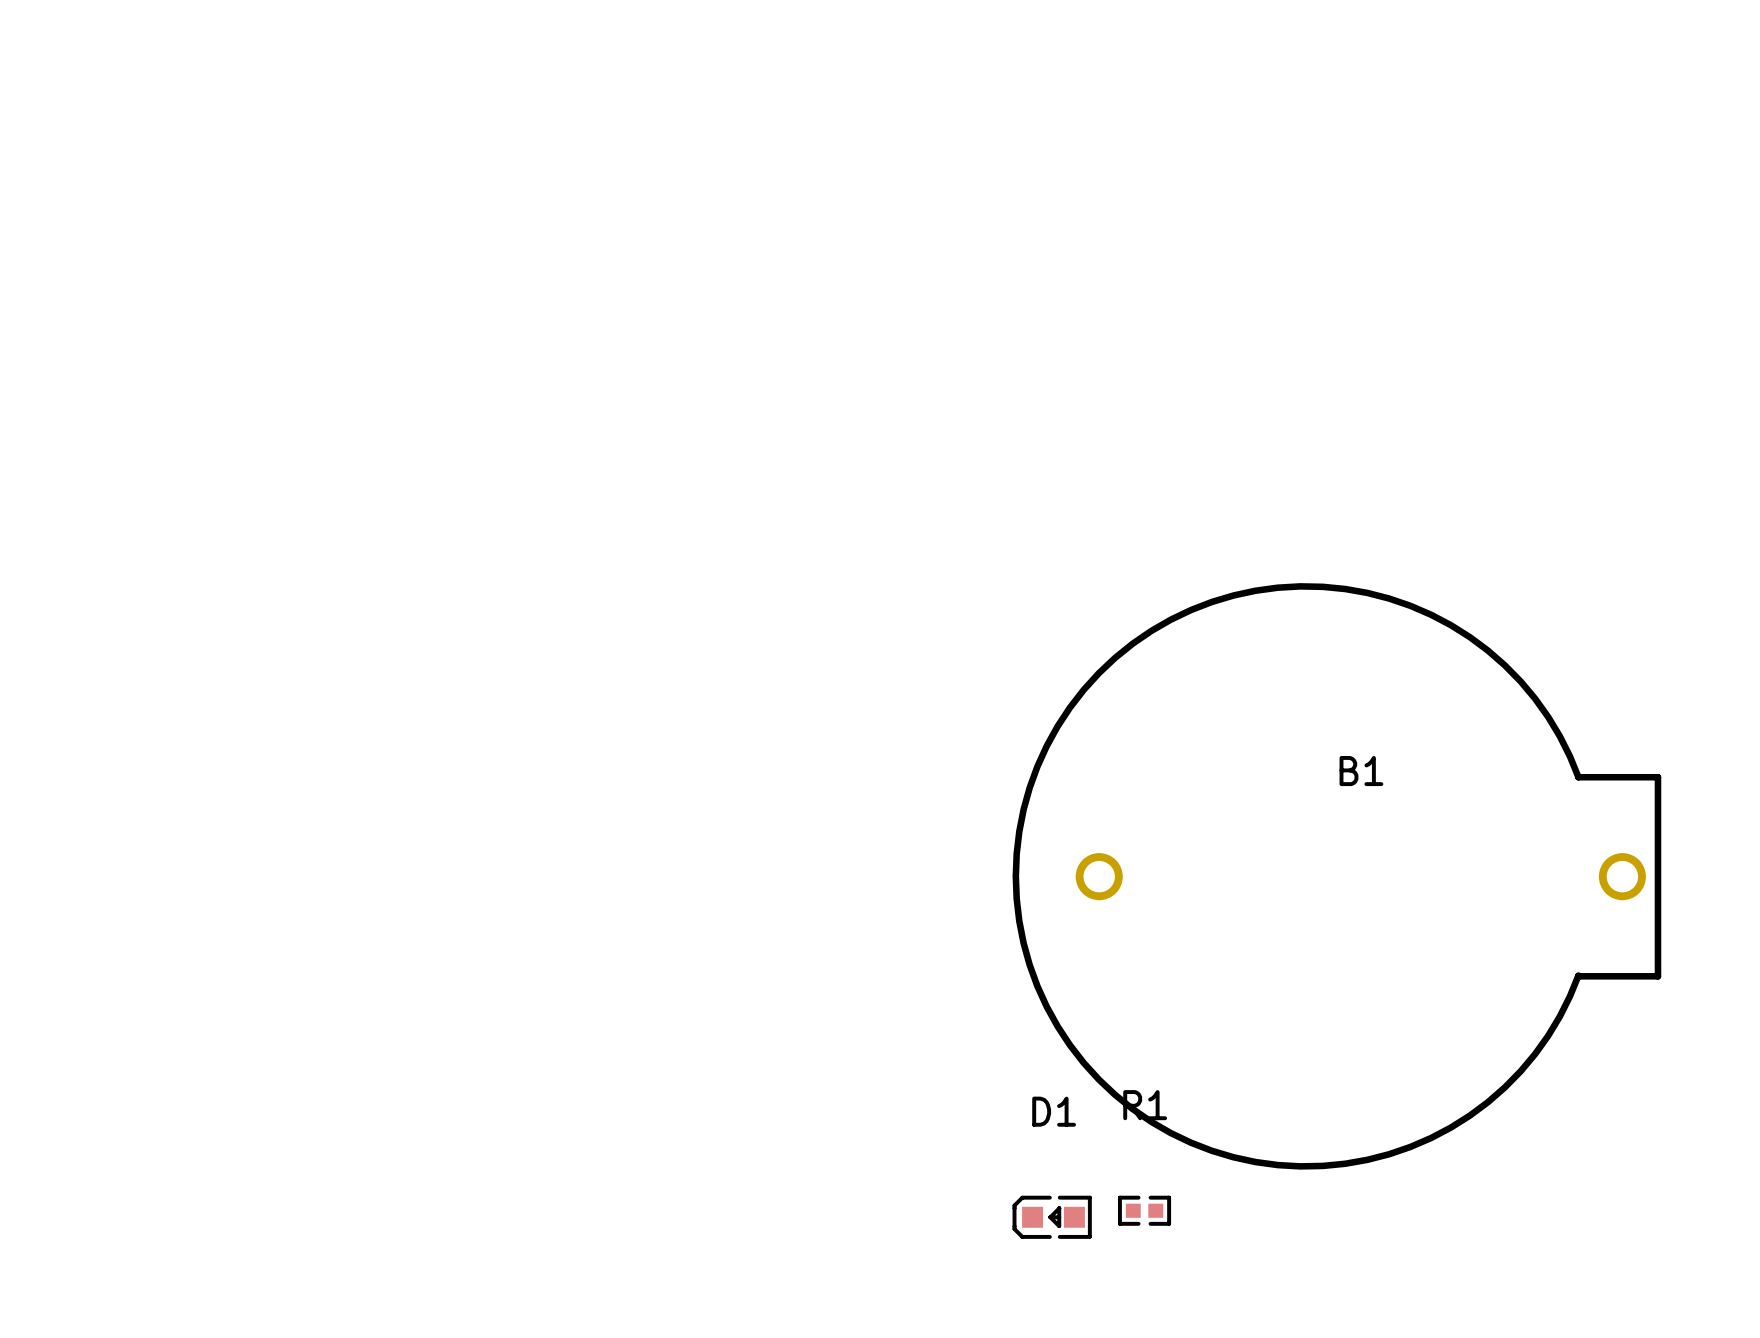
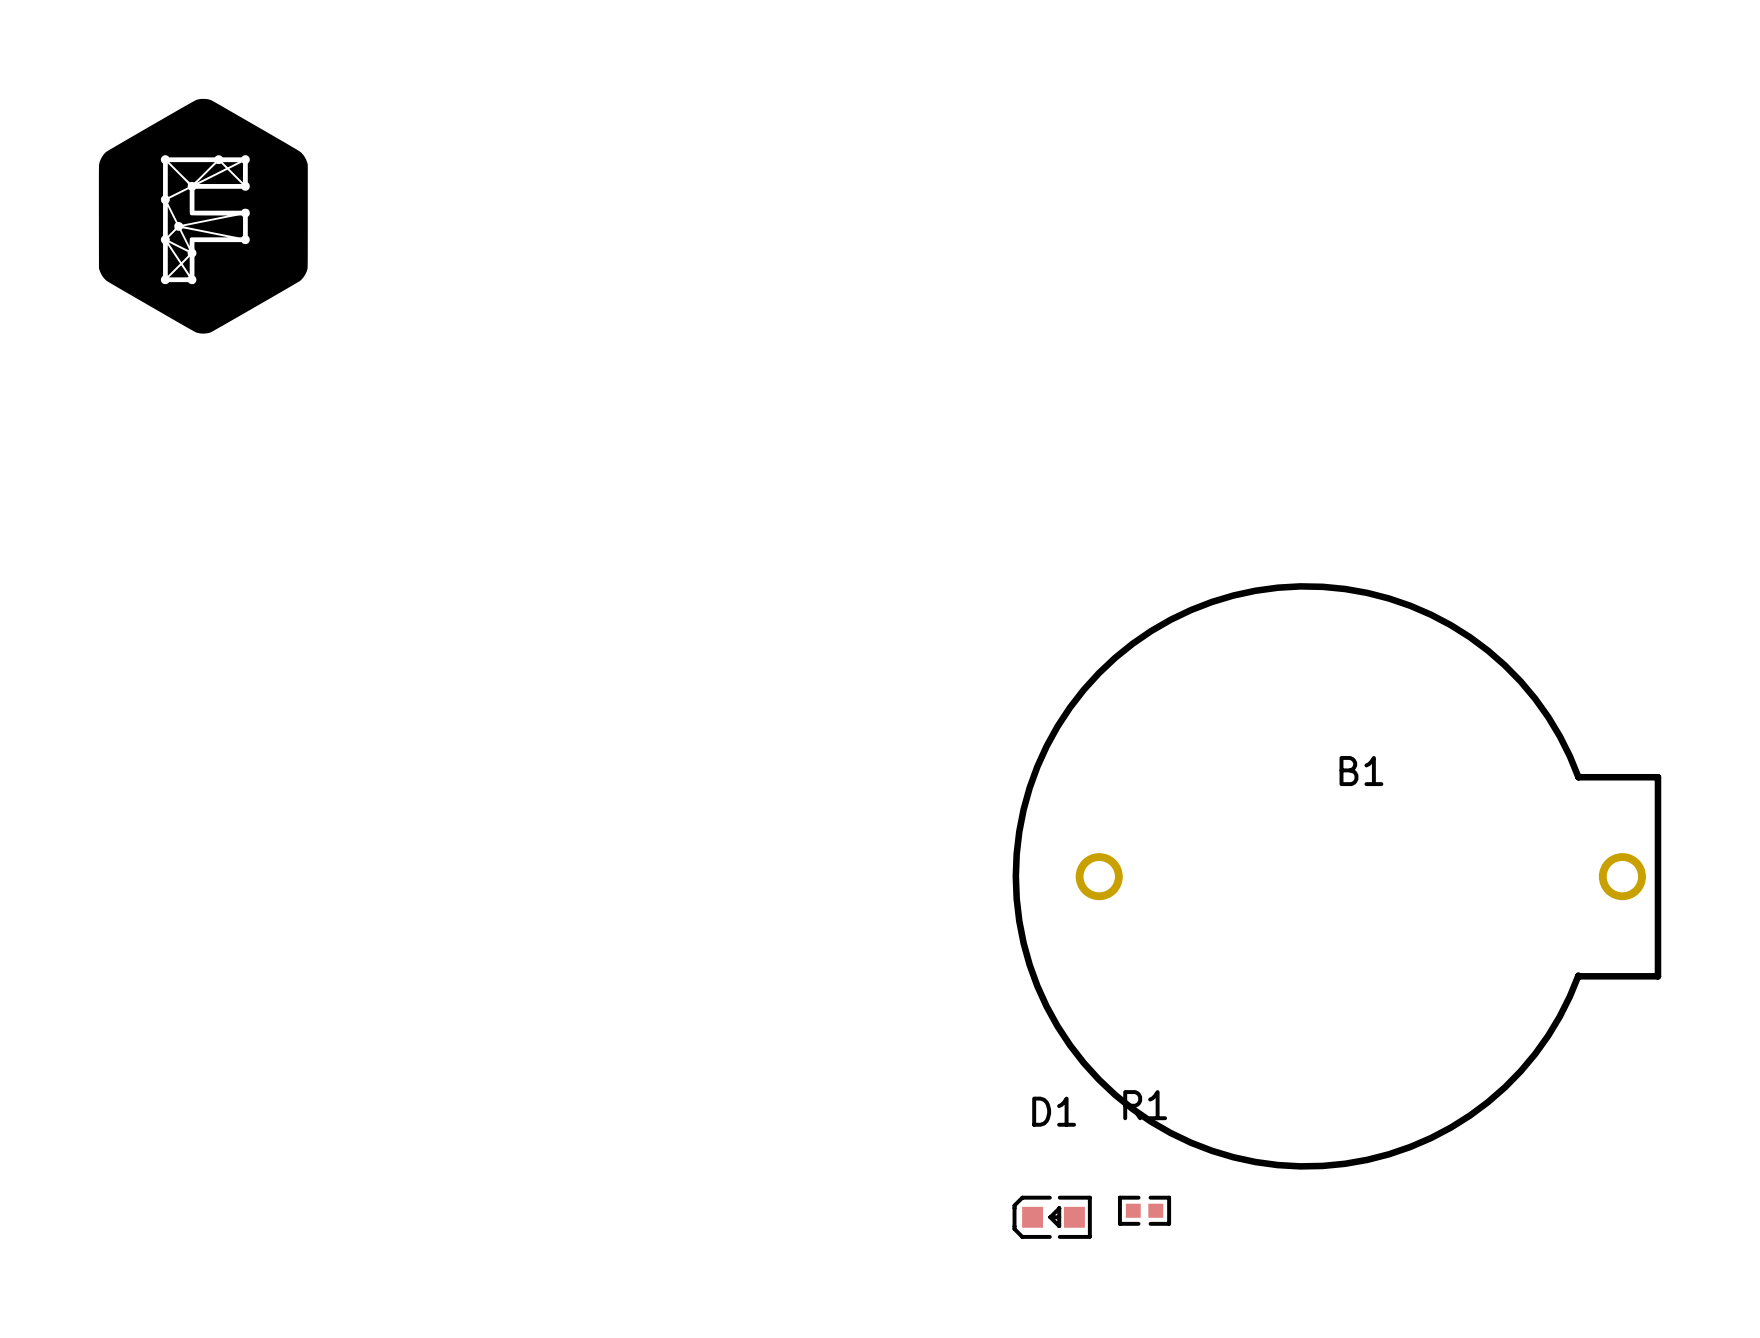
drawing: none -> [98, 98, 308, 334]

